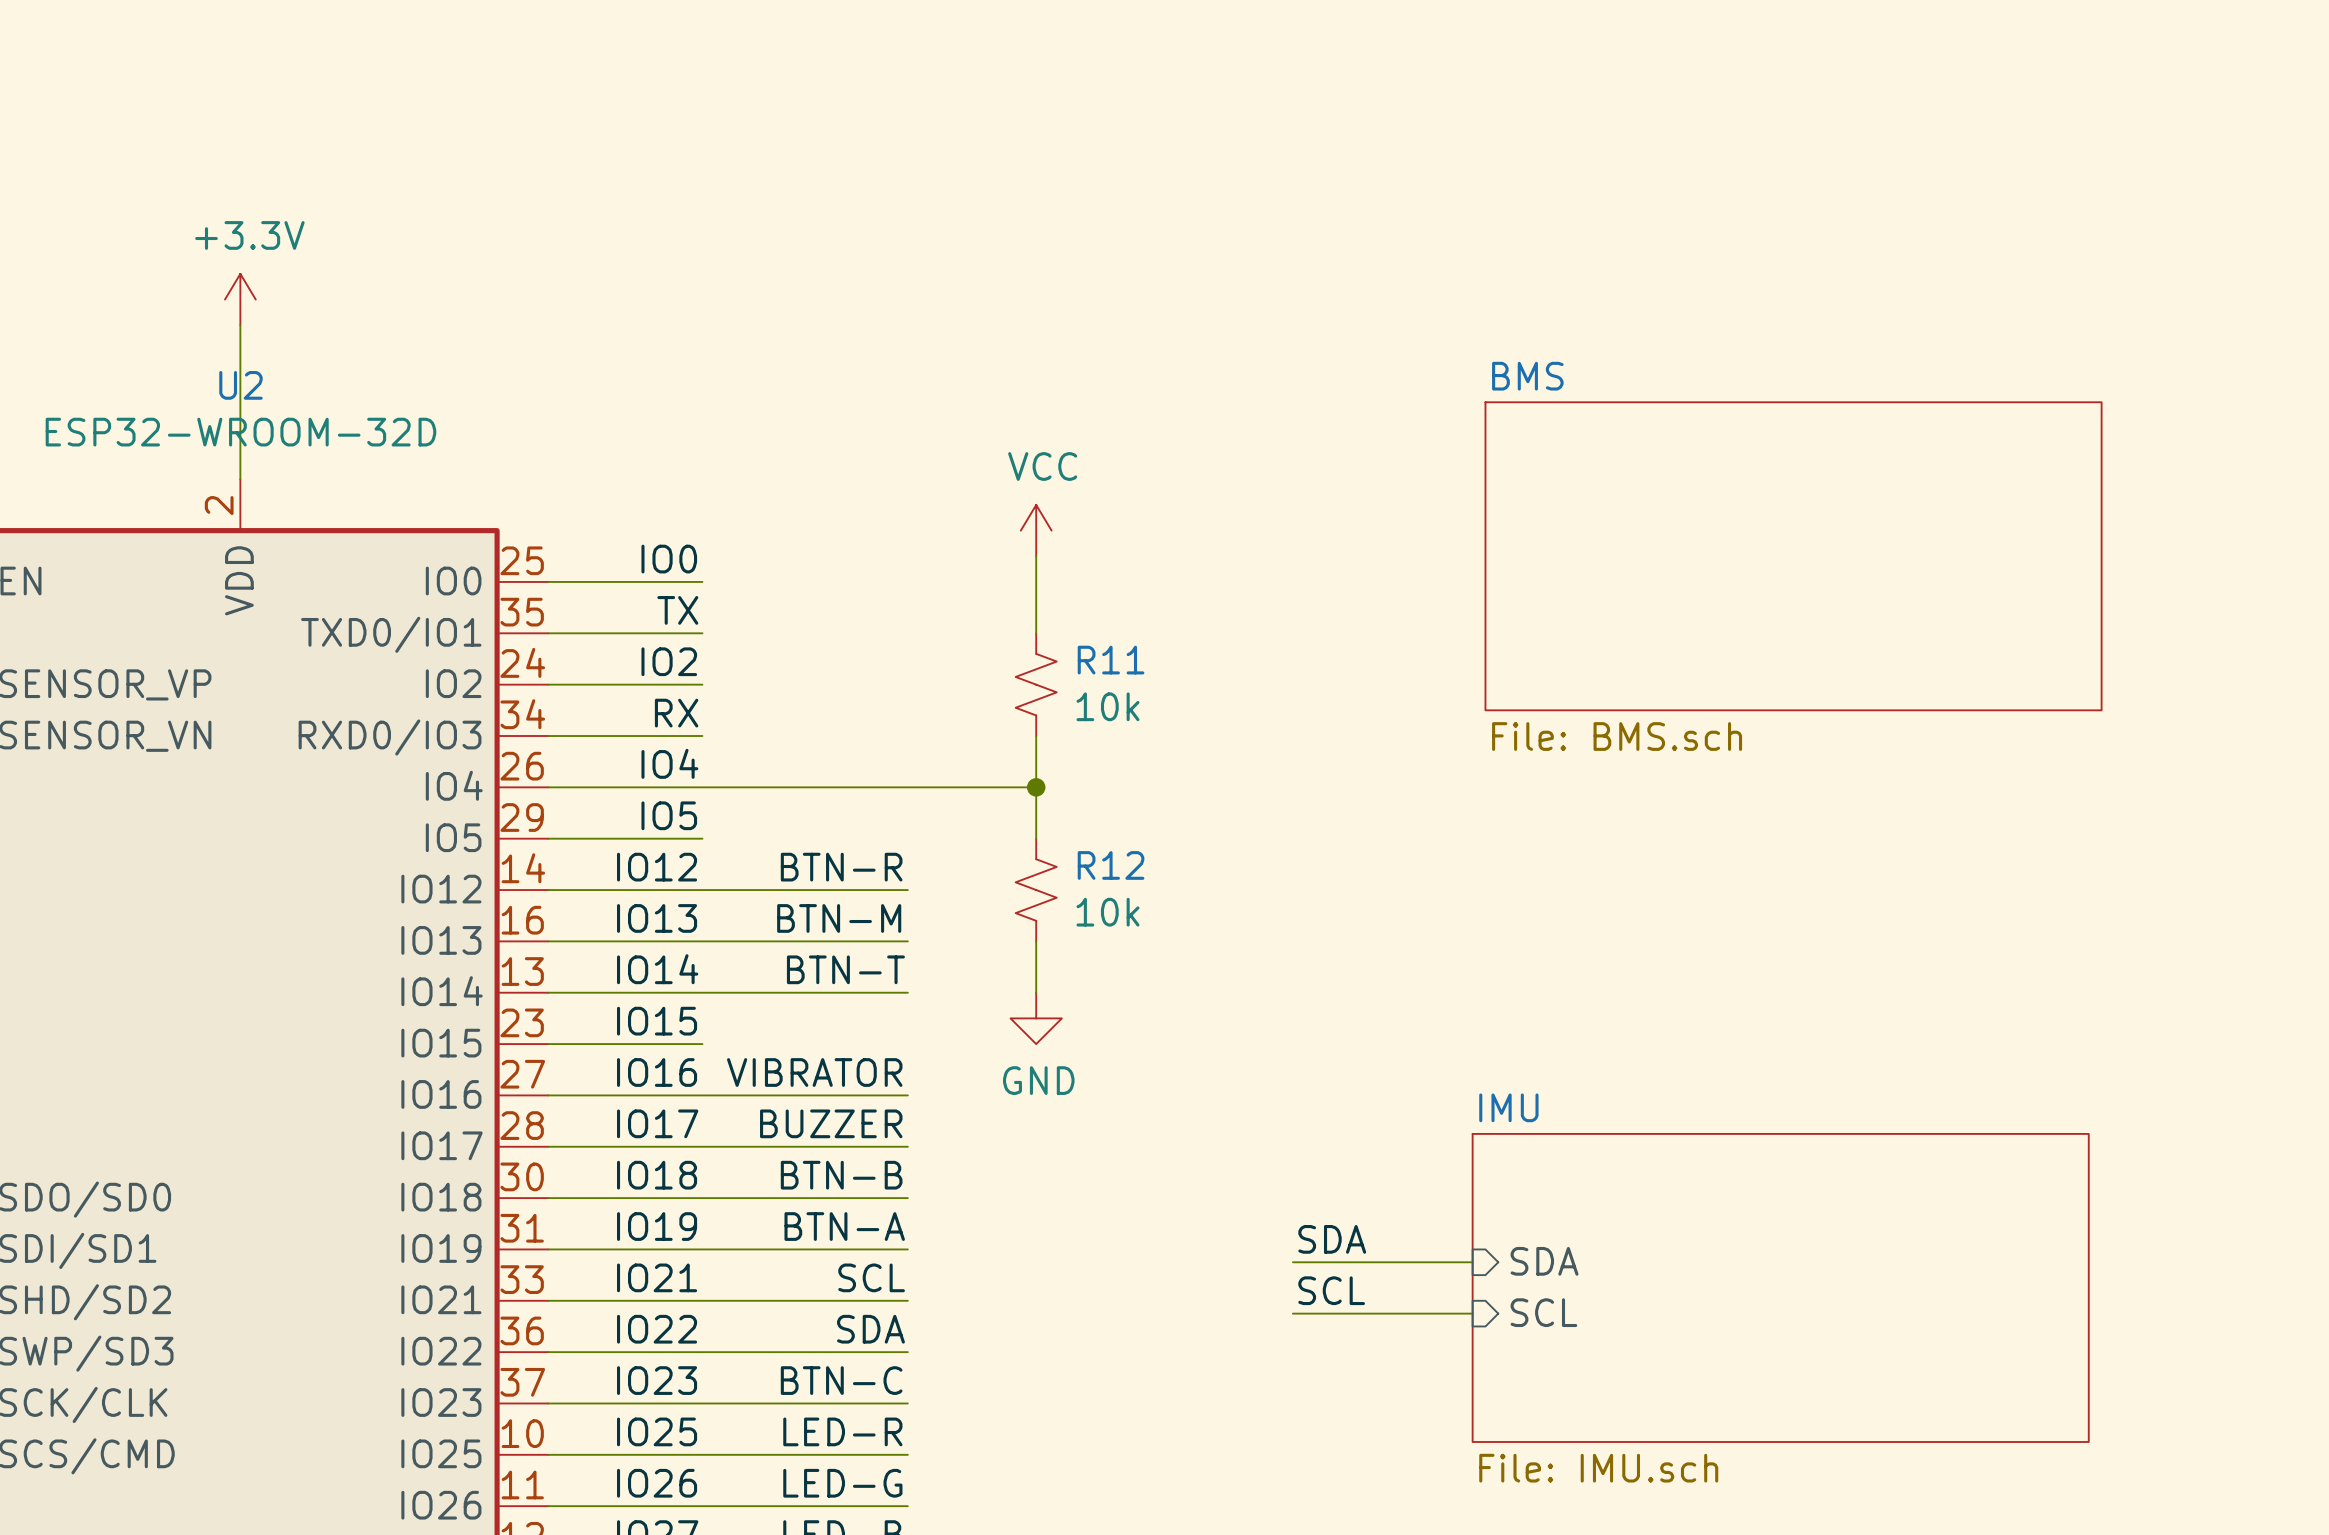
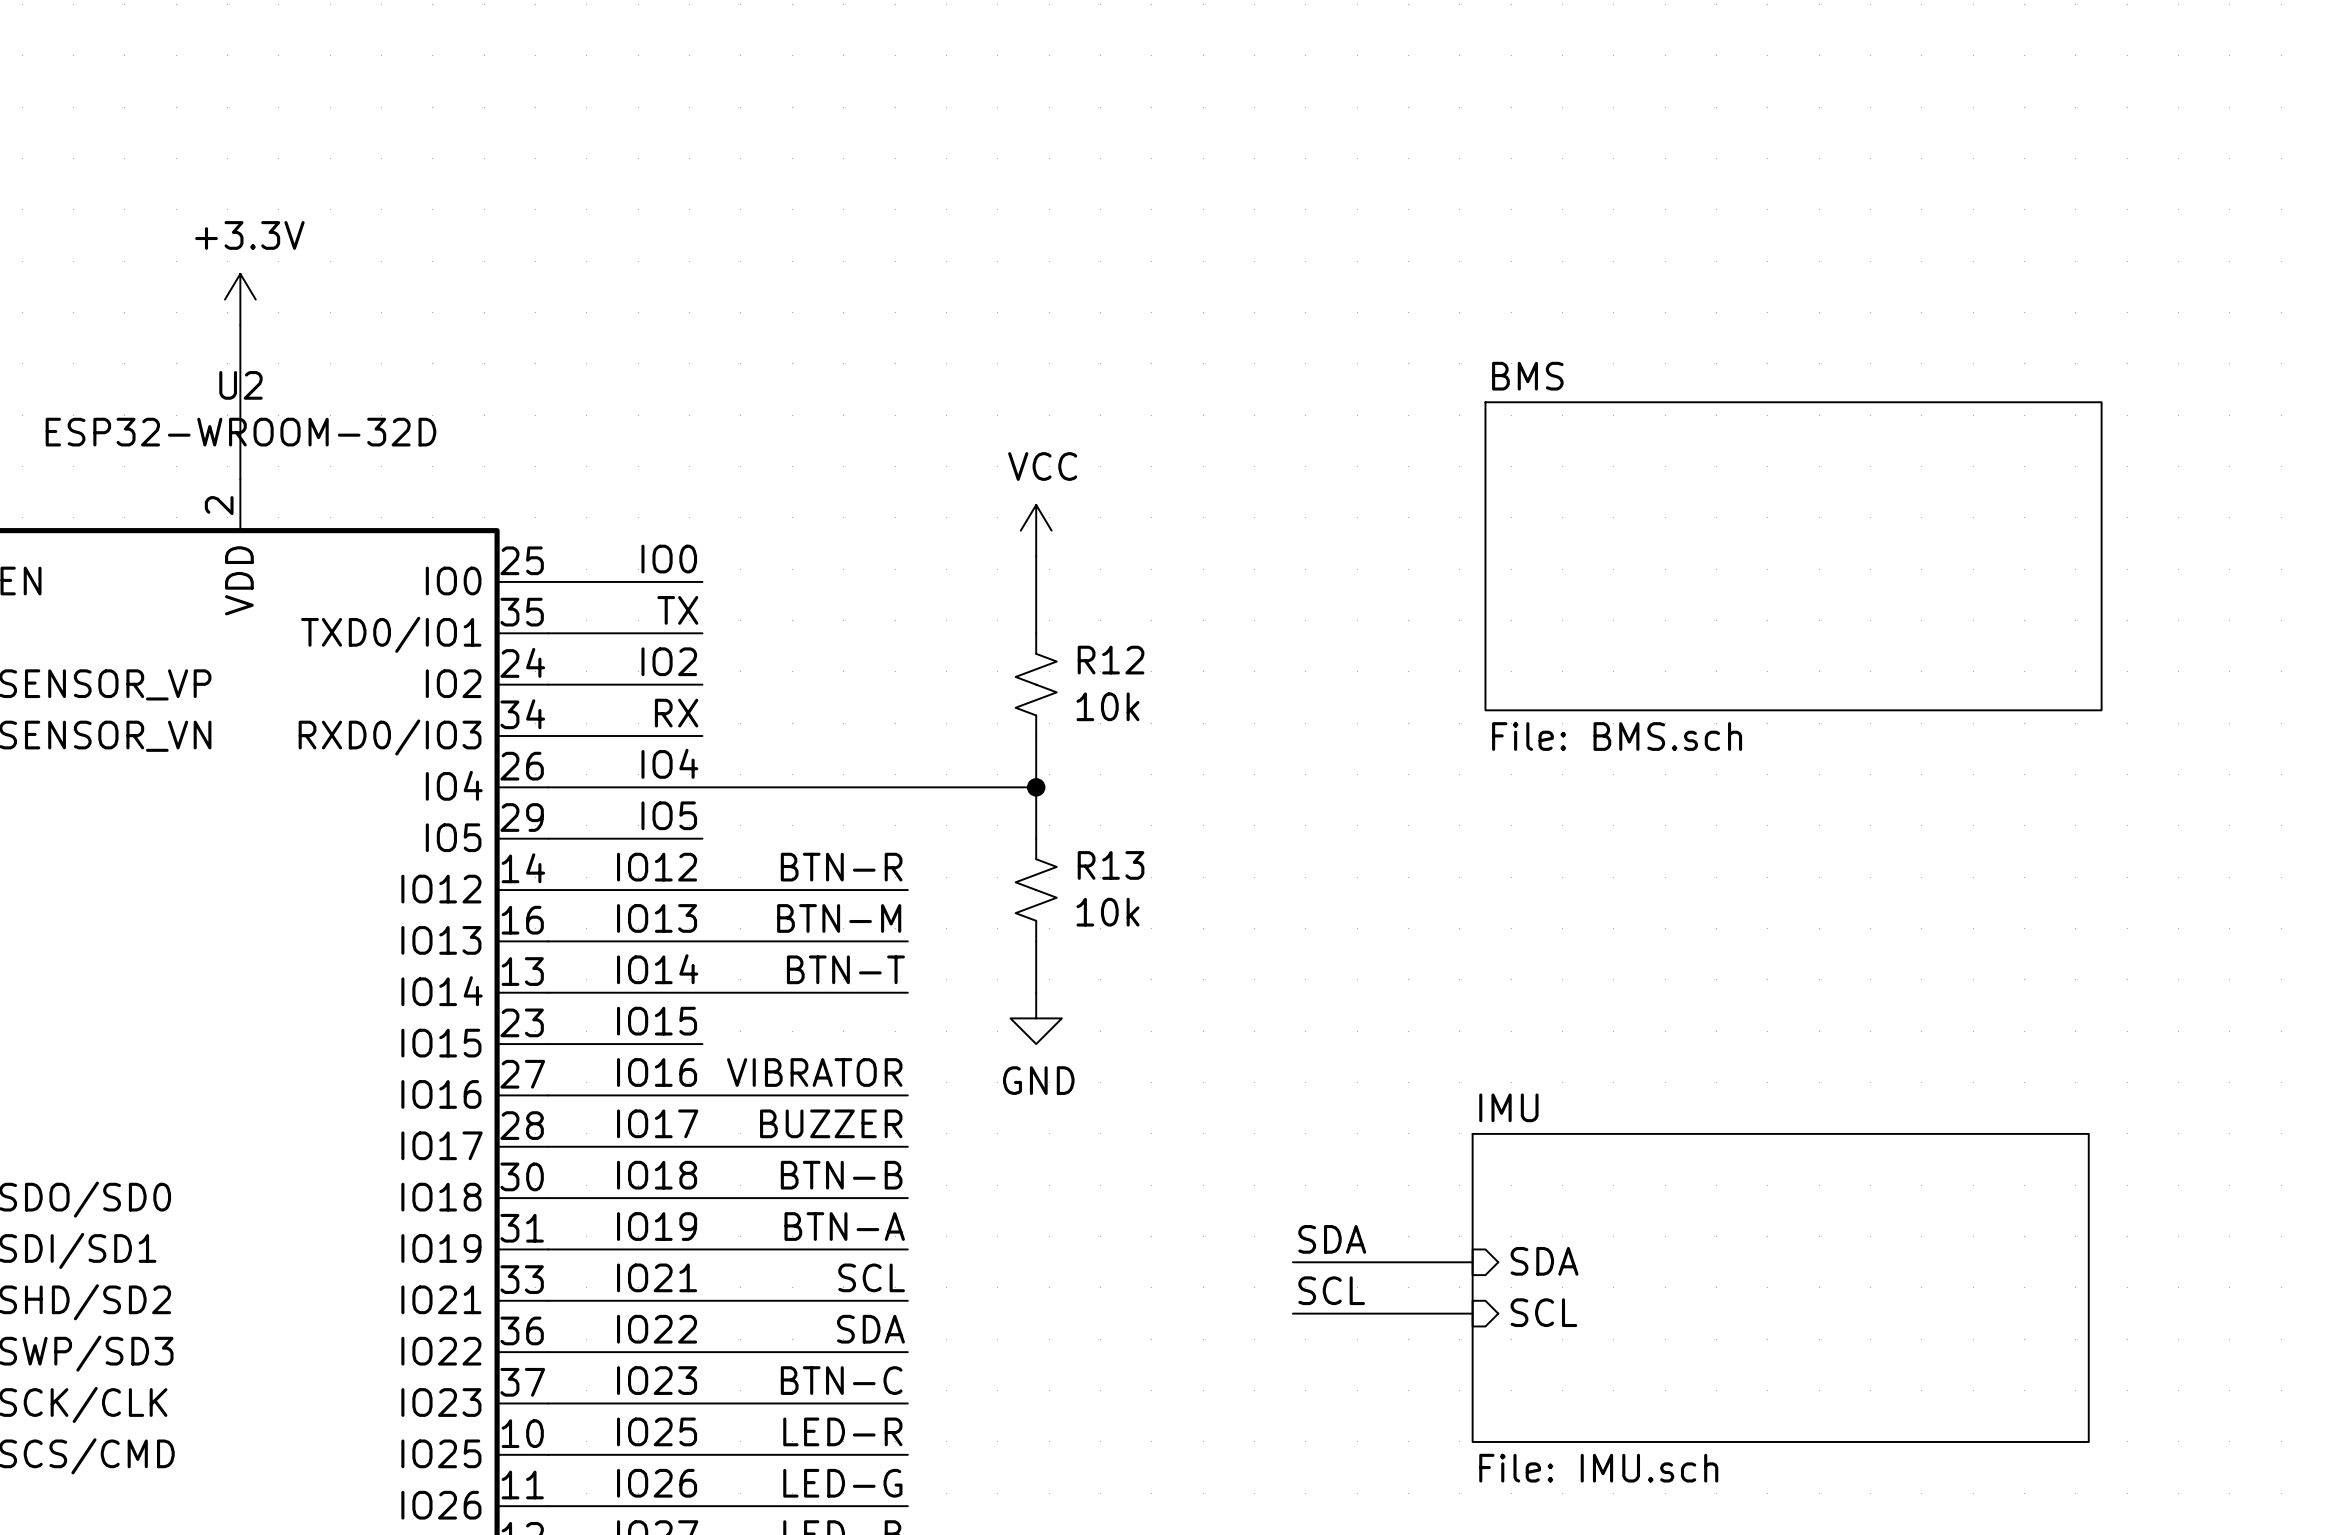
R11 name: R11 (1111, 660) -> R12 (1111, 660)
R12 name: R12 (1111, 865) -> R13 (1111, 865)

